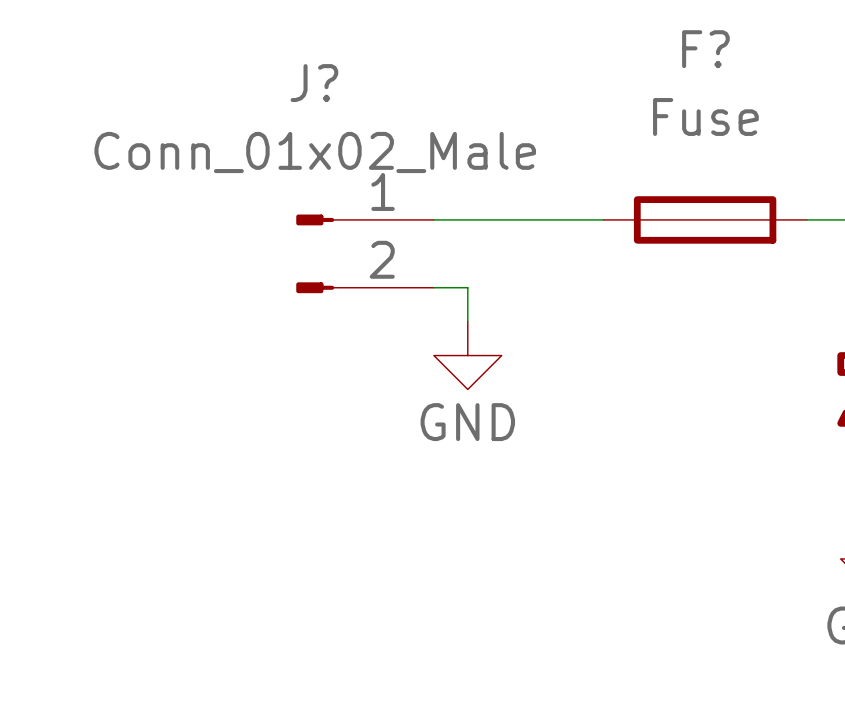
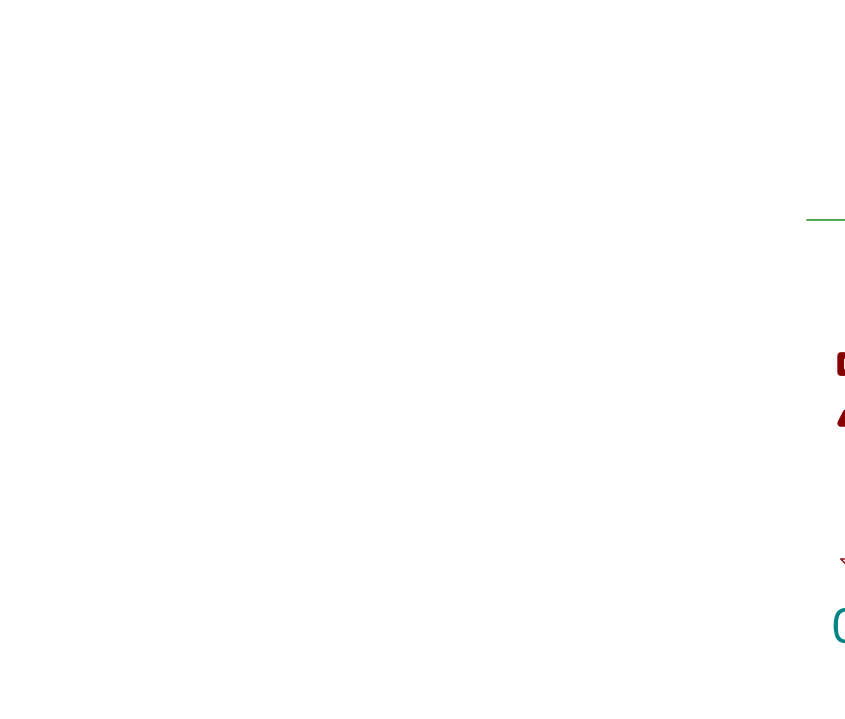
wire: (433, 219) (603, 219) -> none
F?: Fuse (705, 219) -> none
J?: Conn_01x02_Male (365, 253) -> none
wire: (433, 287) (467, 287) (467, 321) -> none
power symbol: GND (467, 355) -> none

